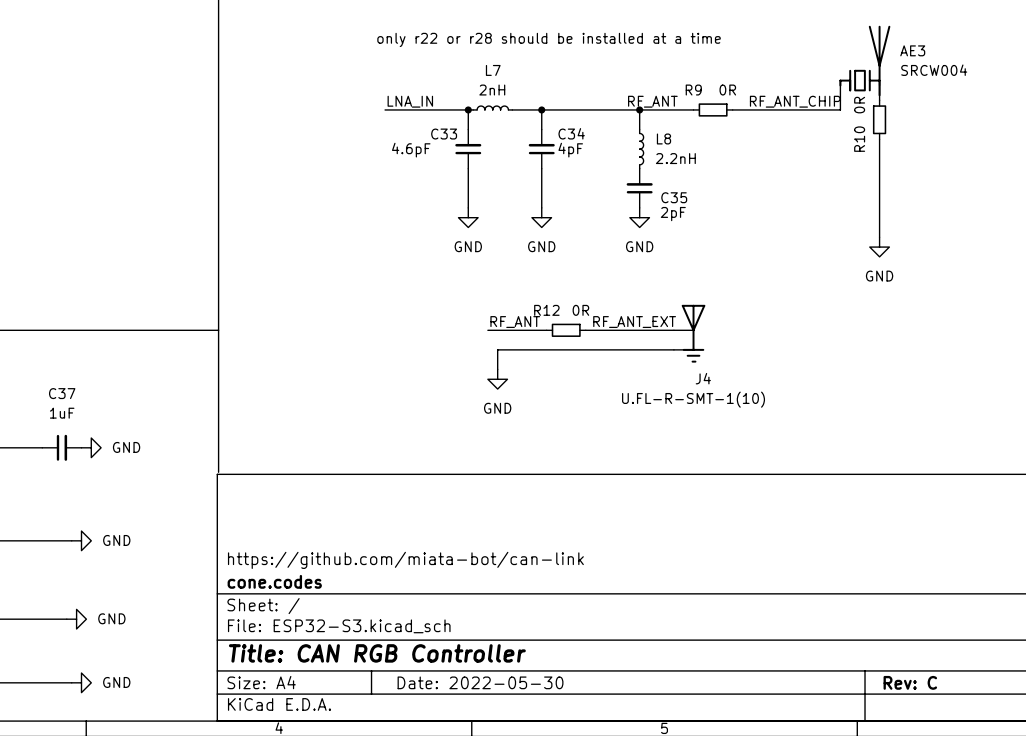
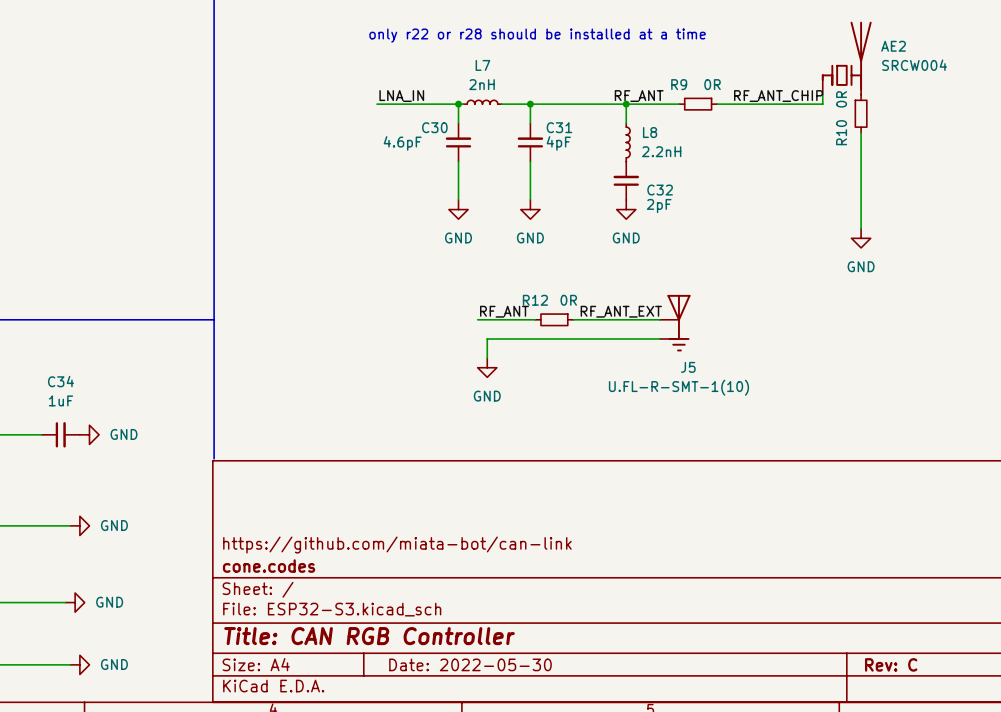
AE3 name: AE3 (912, 50) -> AE2 (893, 46)
C34 name: C34 (571, 133) -> C31 (559, 127)
C33 name: C33 (444, 134) -> C30 (434, 127)
C35 name: C35 (674, 197) -> C32 (660, 190)
J4 name: J4 (703, 378) -> J5 (688, 367)
C37 name: C37 (62, 393) -> C34 (61, 381)

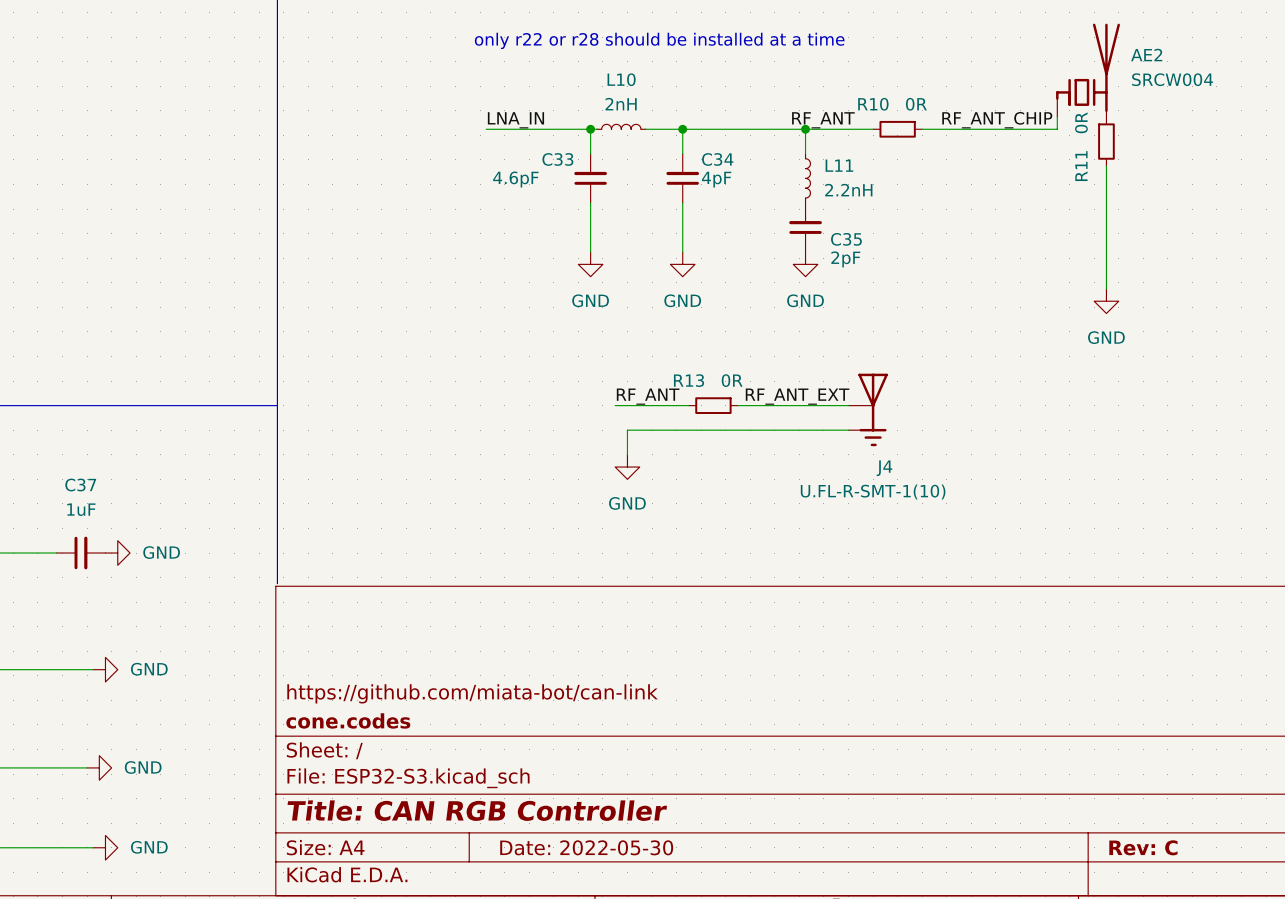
L7 name: L7 (482, 65) -> L10 (621, 79)
R9 name: R9 (679, 84) -> R10 (873, 104)
C30 name: C30 (434, 127) -> C33 (557, 159)
C31 name: C31 (559, 127) -> C34 (717, 159)
L8 name: L8 (650, 132) -> L11 (839, 165)
R10 name: R10 (841, 132) -> R11 (1081, 166)
C32 name: C32 (660, 190) -> C35 (846, 239)
R12 name: R12 (535, 300) -> R13 (689, 380)
J5 name: J5 (688, 367) -> J4 (884, 468)
C34 name: C34 (61, 381) -> C37 (80, 485)

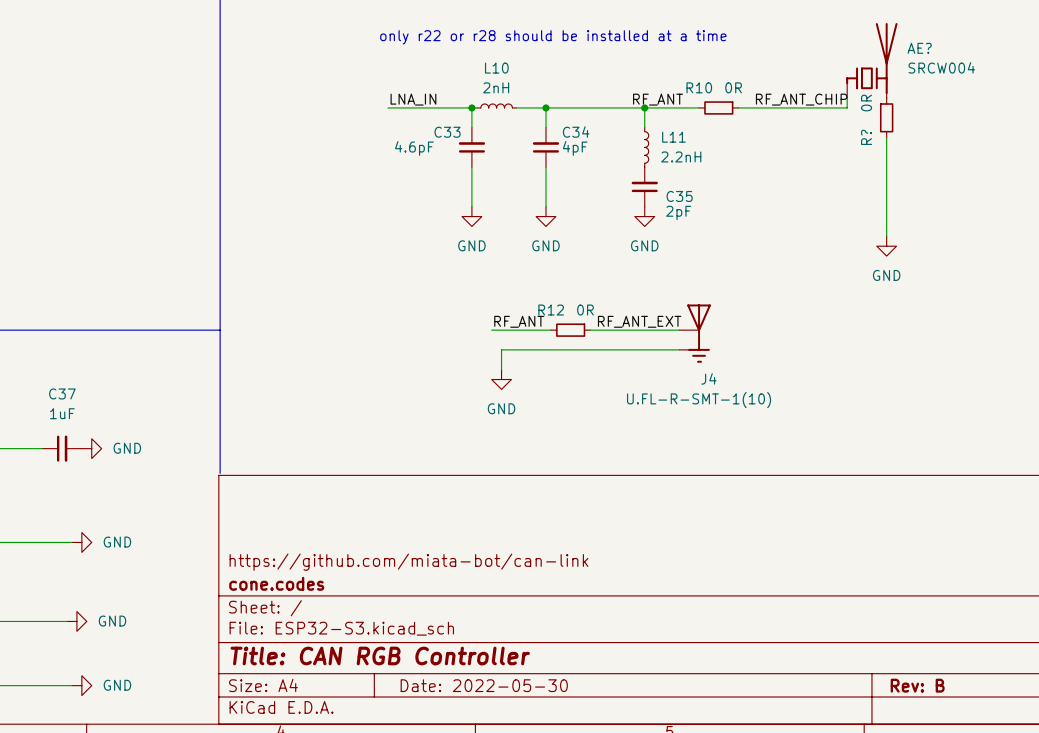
AE2 name: AE2 (1146, 55) -> AE? (919, 48)
R11 name: R11 (1081, 166) -> R? (866, 137)
R13 name: R13 (689, 380) -> R12 (551, 310)
title block: Rev: C (1143, 847) -> Rev: B (917, 685)

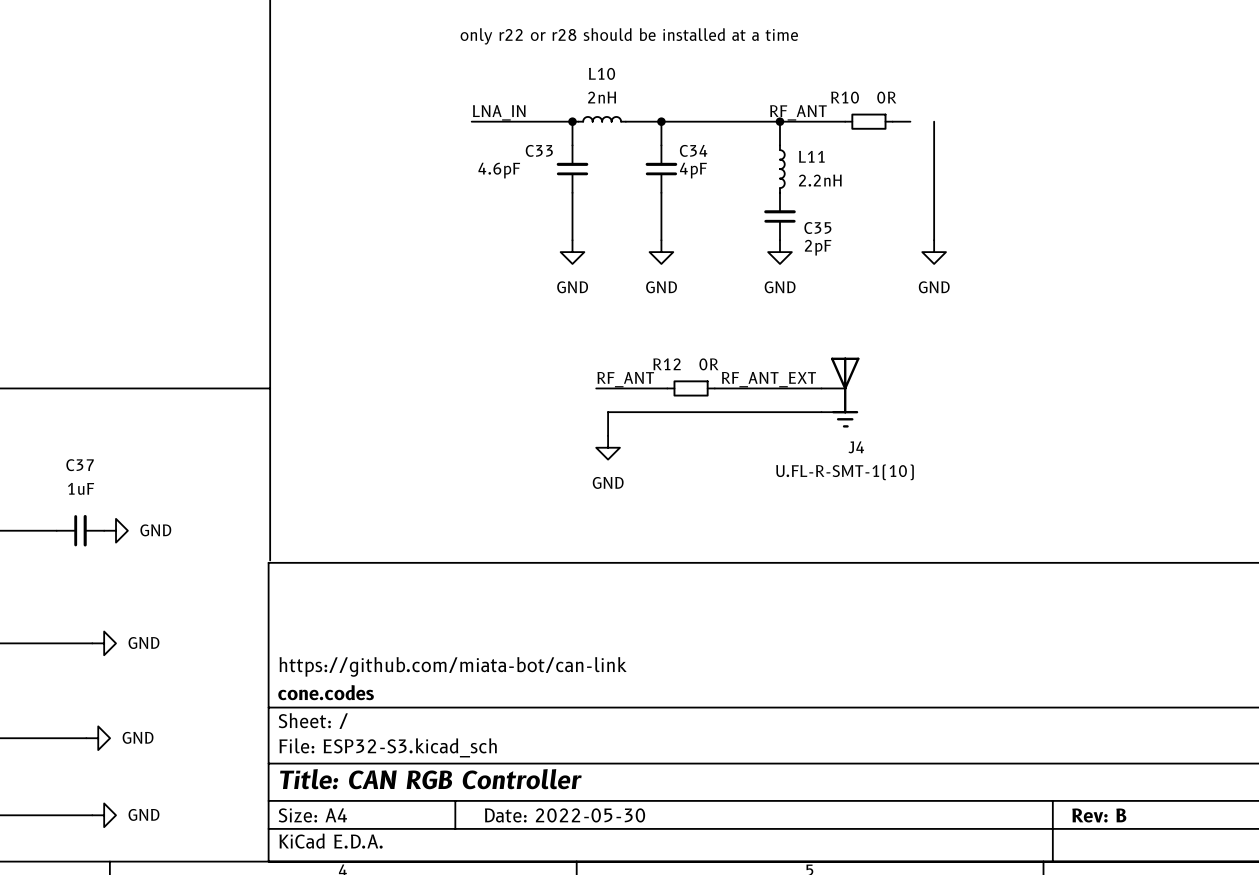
AE?: SRCW004 (871, 60) -> none
wire: (847, 98) (847, 107) (753, 107) -> none
label: RF_ANT_CHIP (801, 99) -> none
R?: 0R (886, 117) -> none
wire: (886, 137) (886, 236) -> (934, 121) (934, 240)
power symbol position: GND (886, 246) -> GND (934, 252)

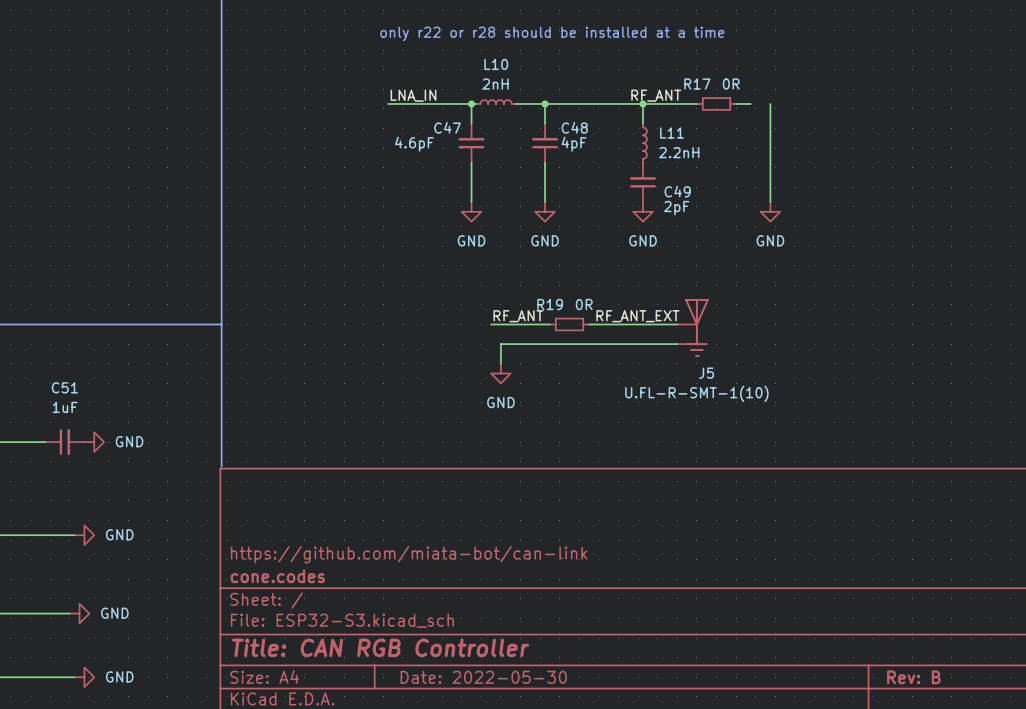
R10 name: R10 (845, 97) -> R17 (697, 84)
C33 name: C33 (539, 150) -> C47 (447, 127)
C34 name: C34 (693, 150) -> C48 (574, 127)
C35 name: C35 (817, 228) -> C49 (677, 191)
R12 name: R12 (667, 364) -> R19 (550, 304)
J4 name: J4 (856, 447) -> J5 (706, 373)
C37 name: C37 (80, 465) -> C51 (64, 387)

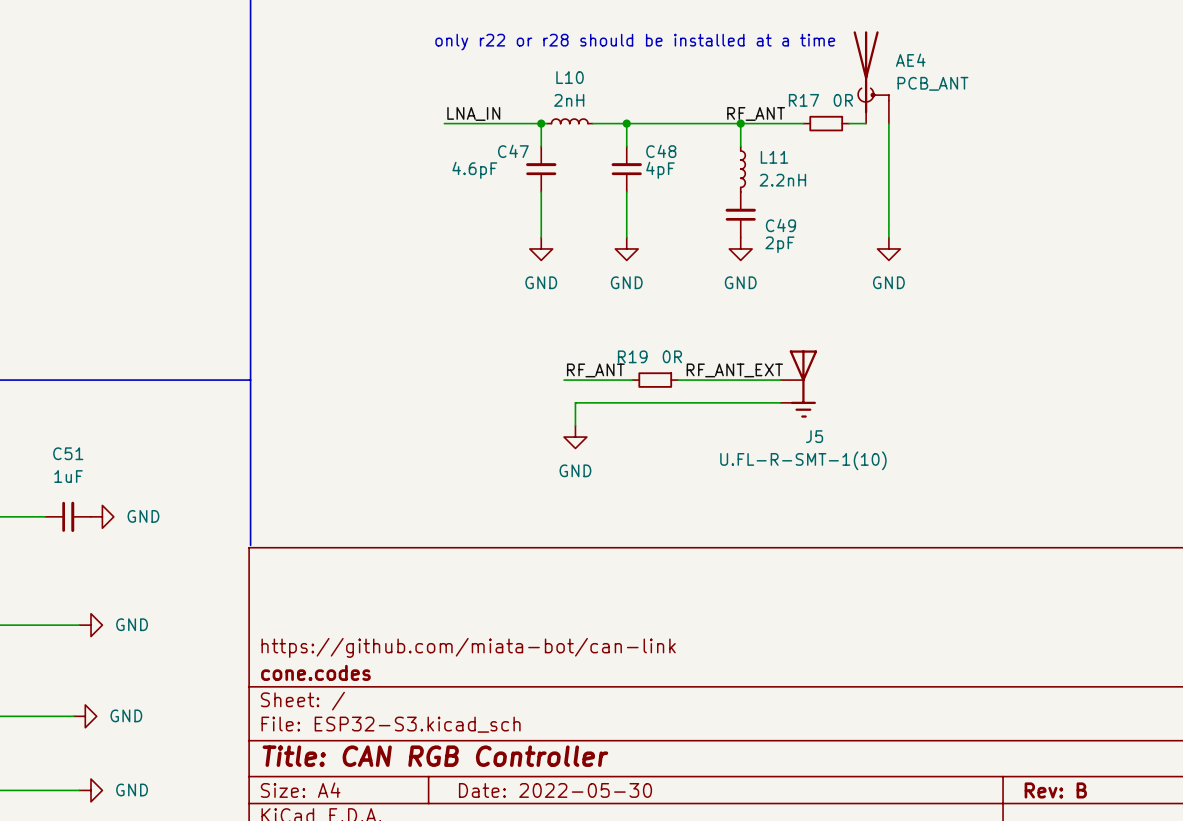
AE4: none -> PCB_ANT (871, 77)

